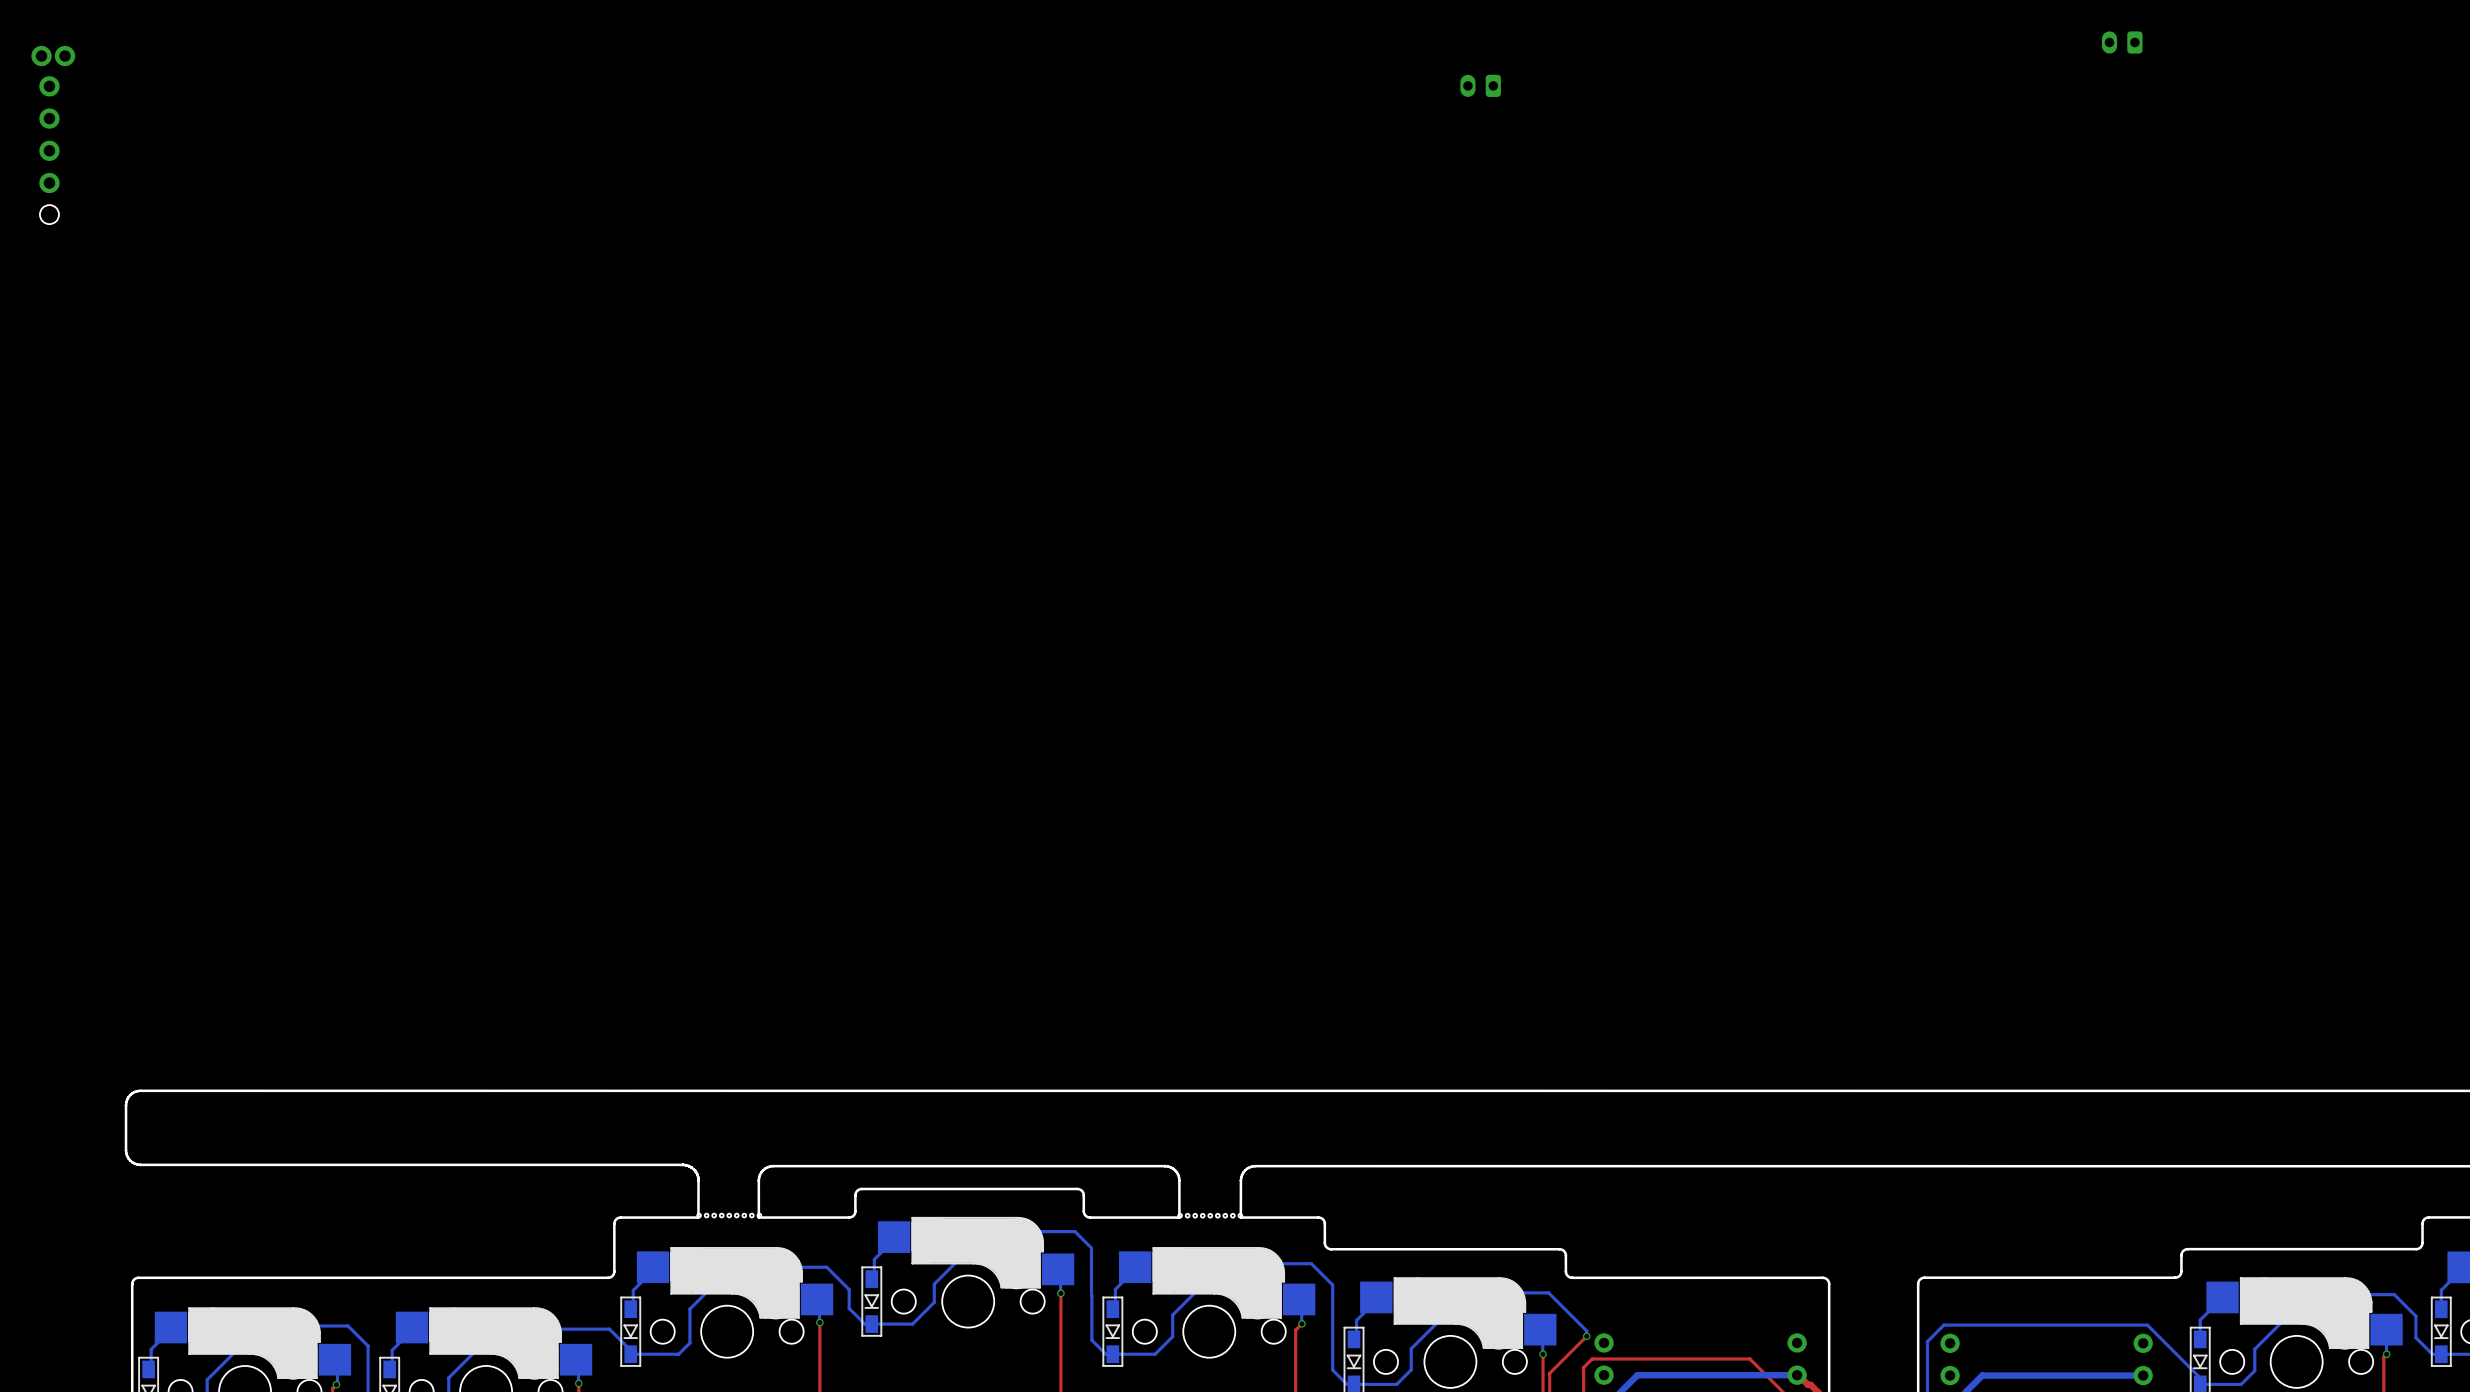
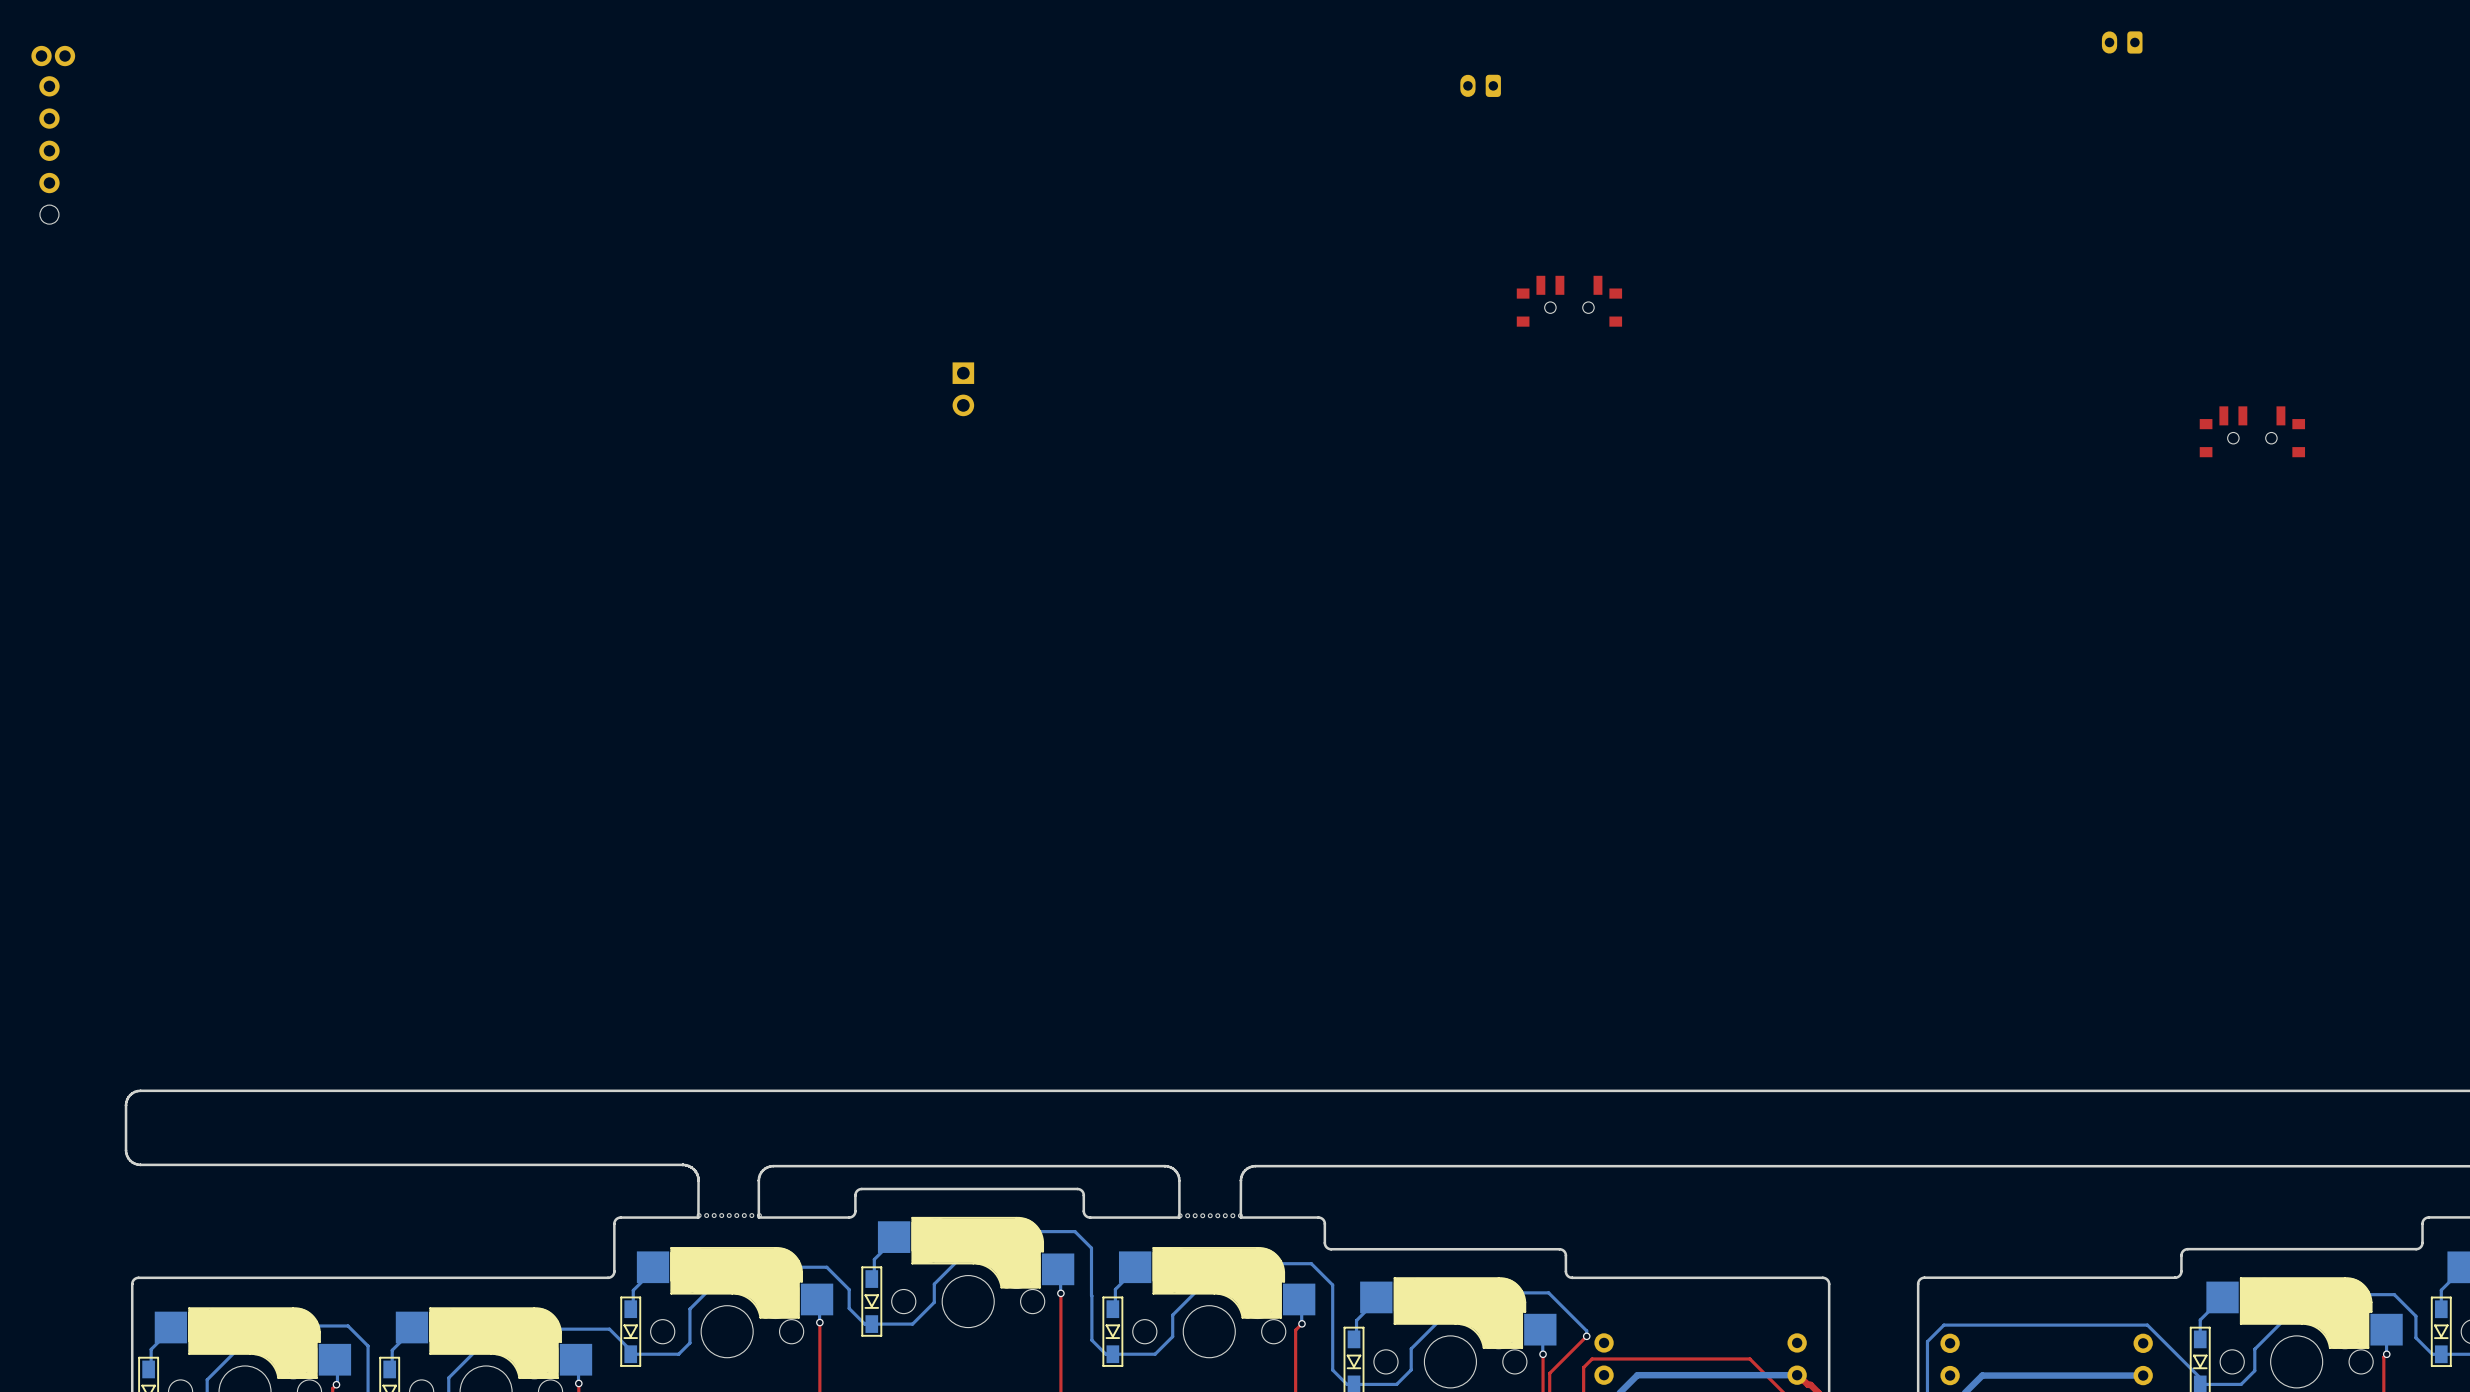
part: none -> (1569, 301)
part: none -> (963, 389)
part: none -> (2252, 431)

